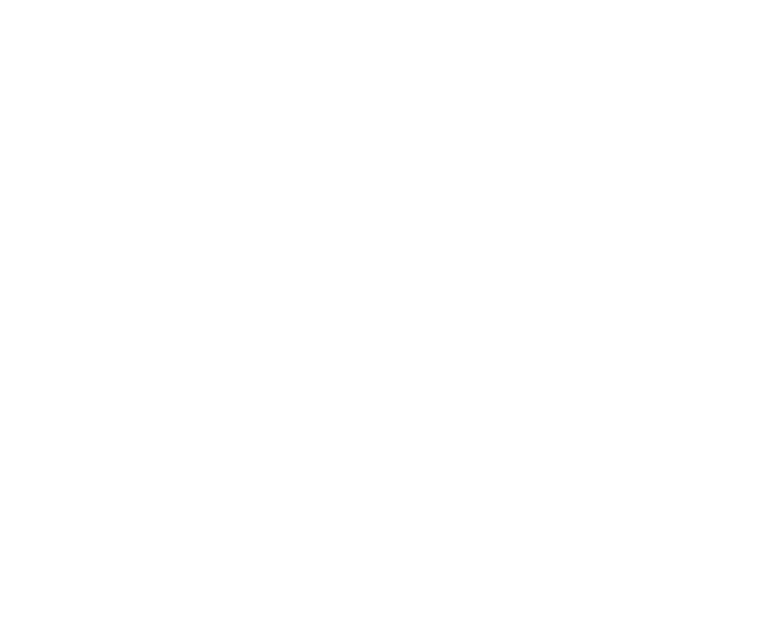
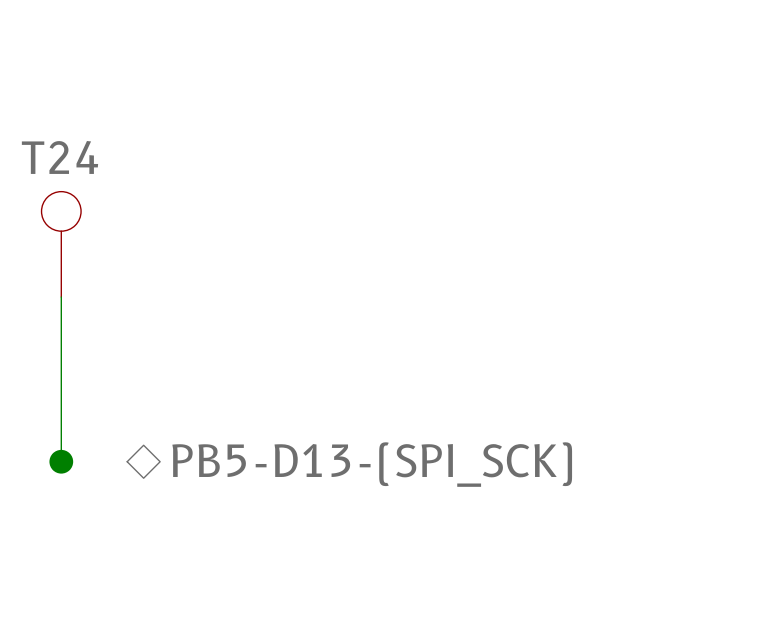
T24: none -> (61, 244)
wire: none -> (61, 297) (61, 461)
junction: none -> (61, 461)
hierarchical label: none -> PB5-D13-(SPI_SCK) (372, 464)

